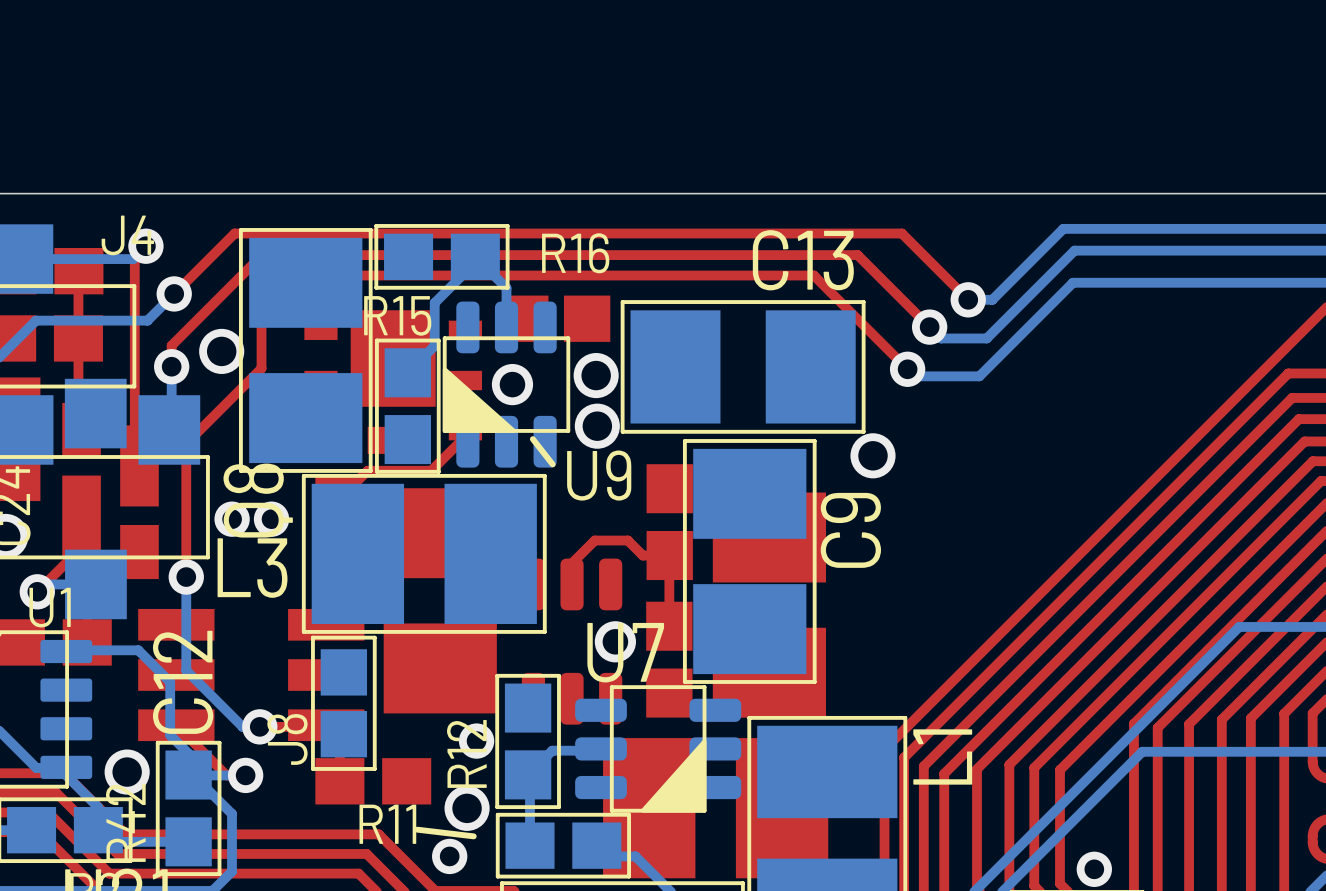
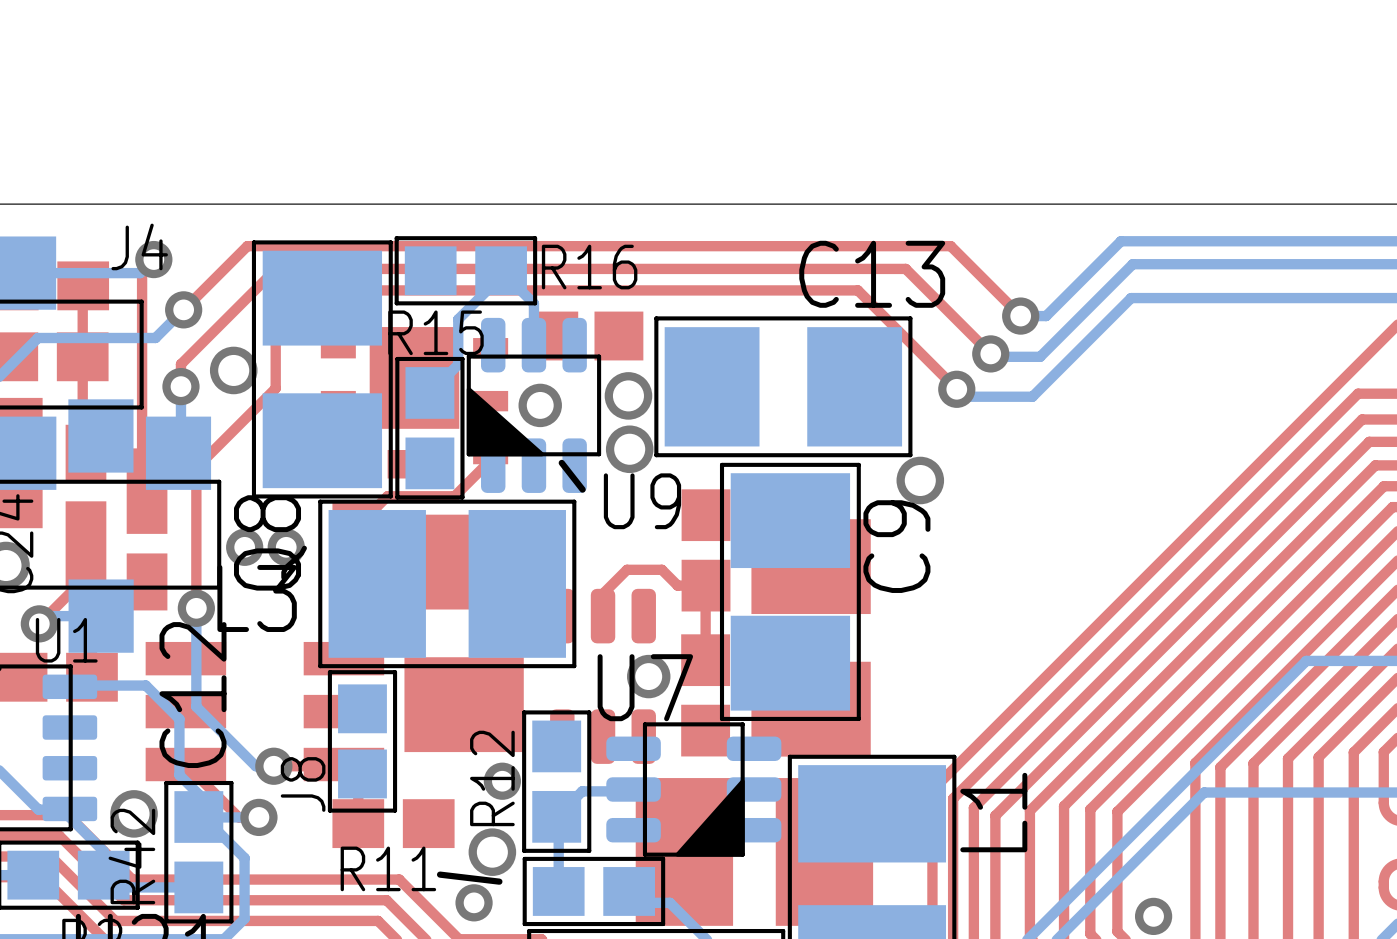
top track: (857, 255) (929, 327) -> (904, 268) (990, 353)
via position: (929, 327) -> (990, 353)

